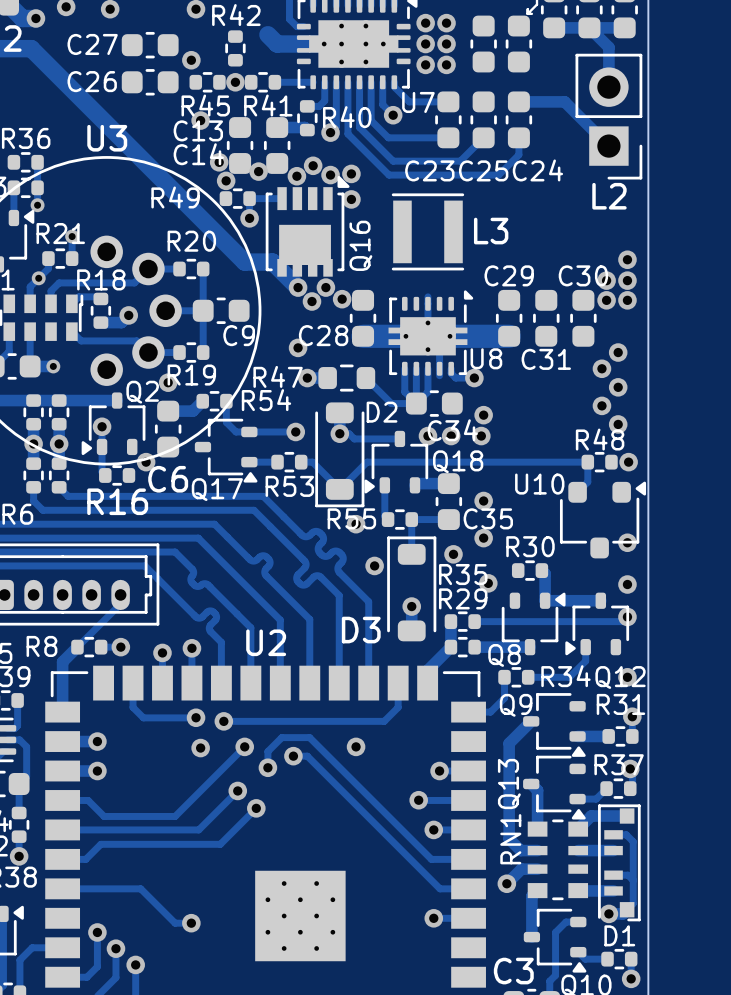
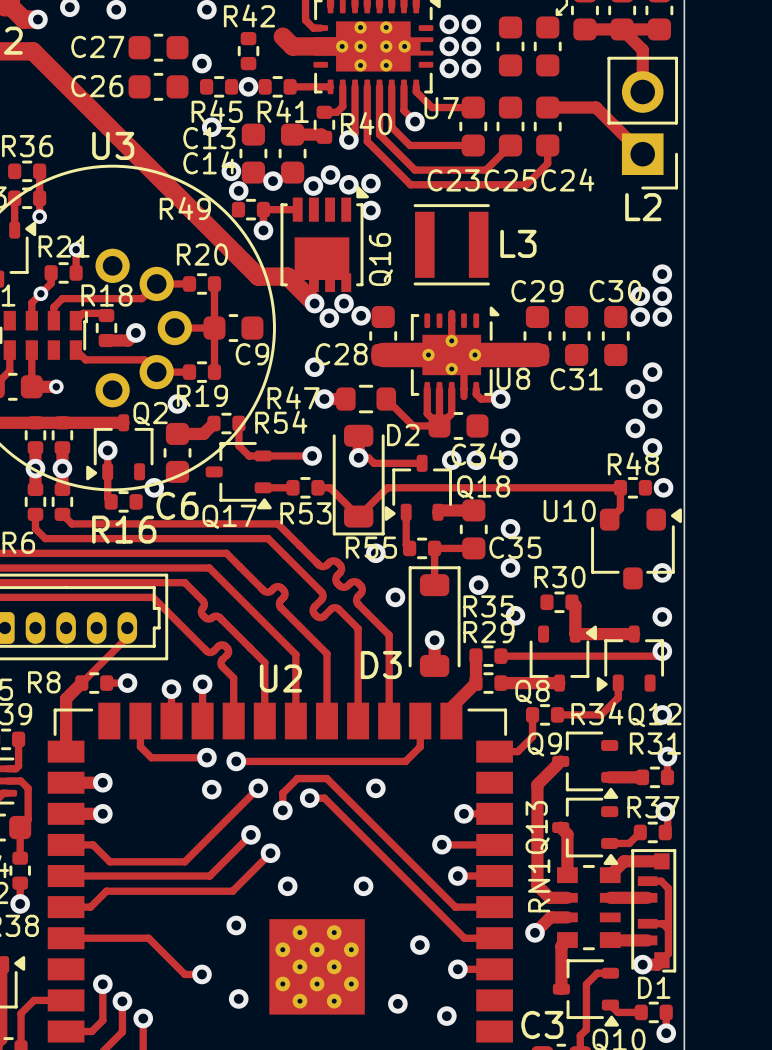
via: none -> (287, 886)
via: none -> (363, 886)
via: none -> (236, 925)
via: none -> (419, 945)
via: none -> (238, 998)
via: none -> (397, 1003)
via: none -> (446, 1016)

